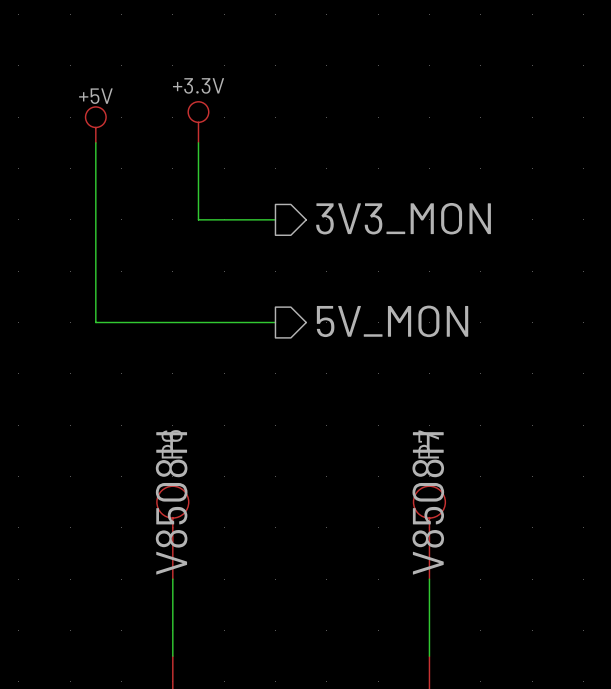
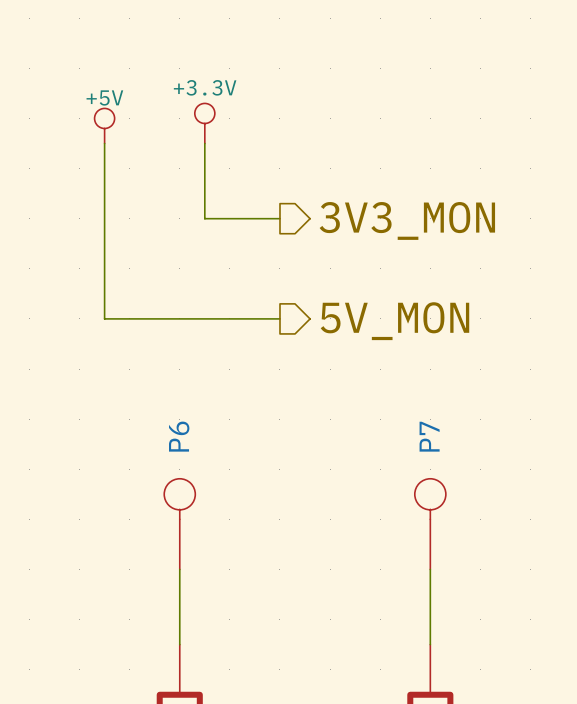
P6 text: V8508H (171, 503) -> none
P7 text: V8508H (428, 503) -> none

